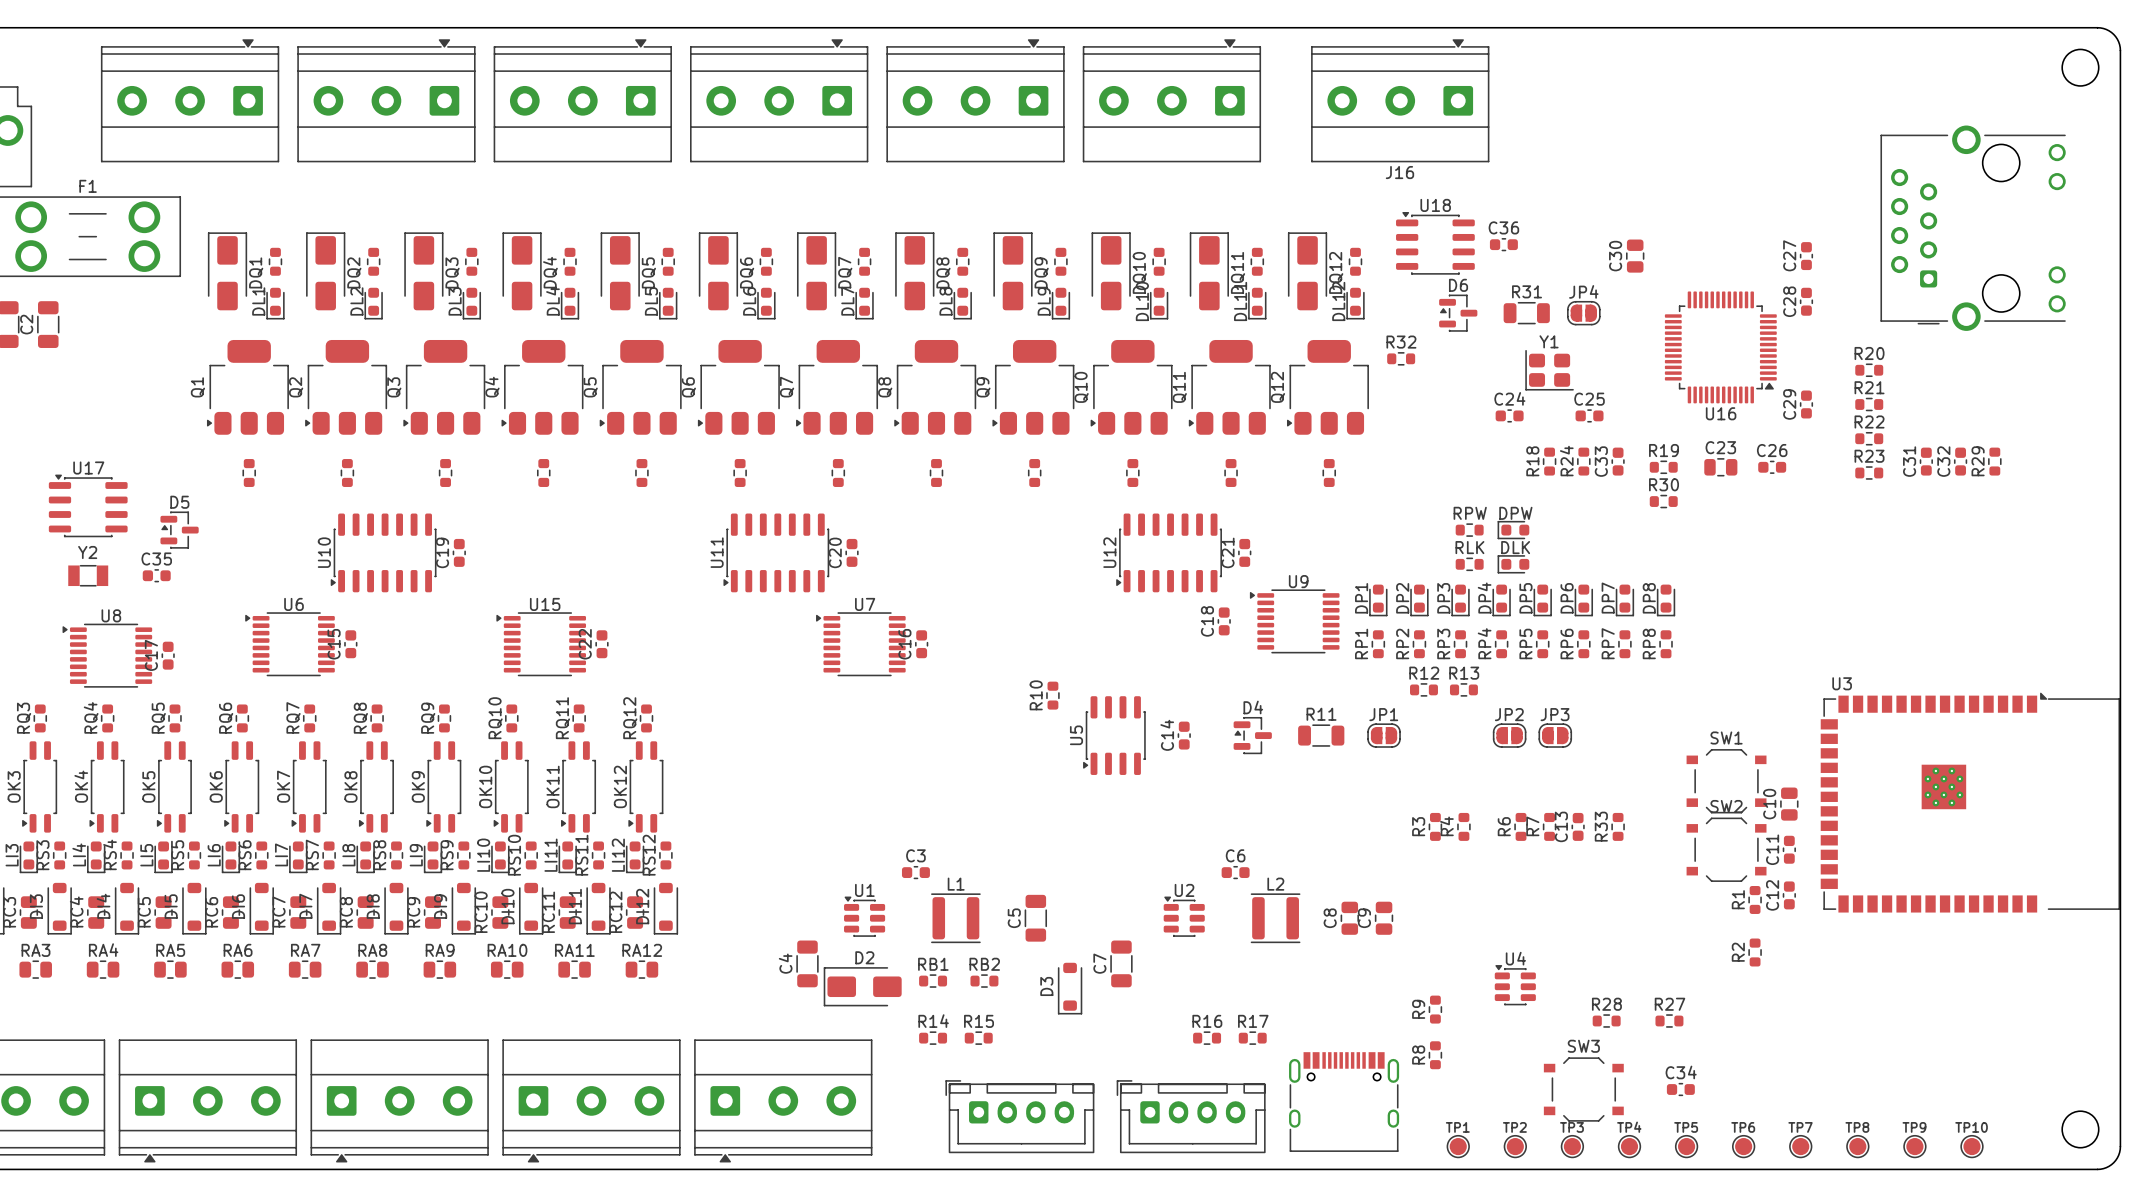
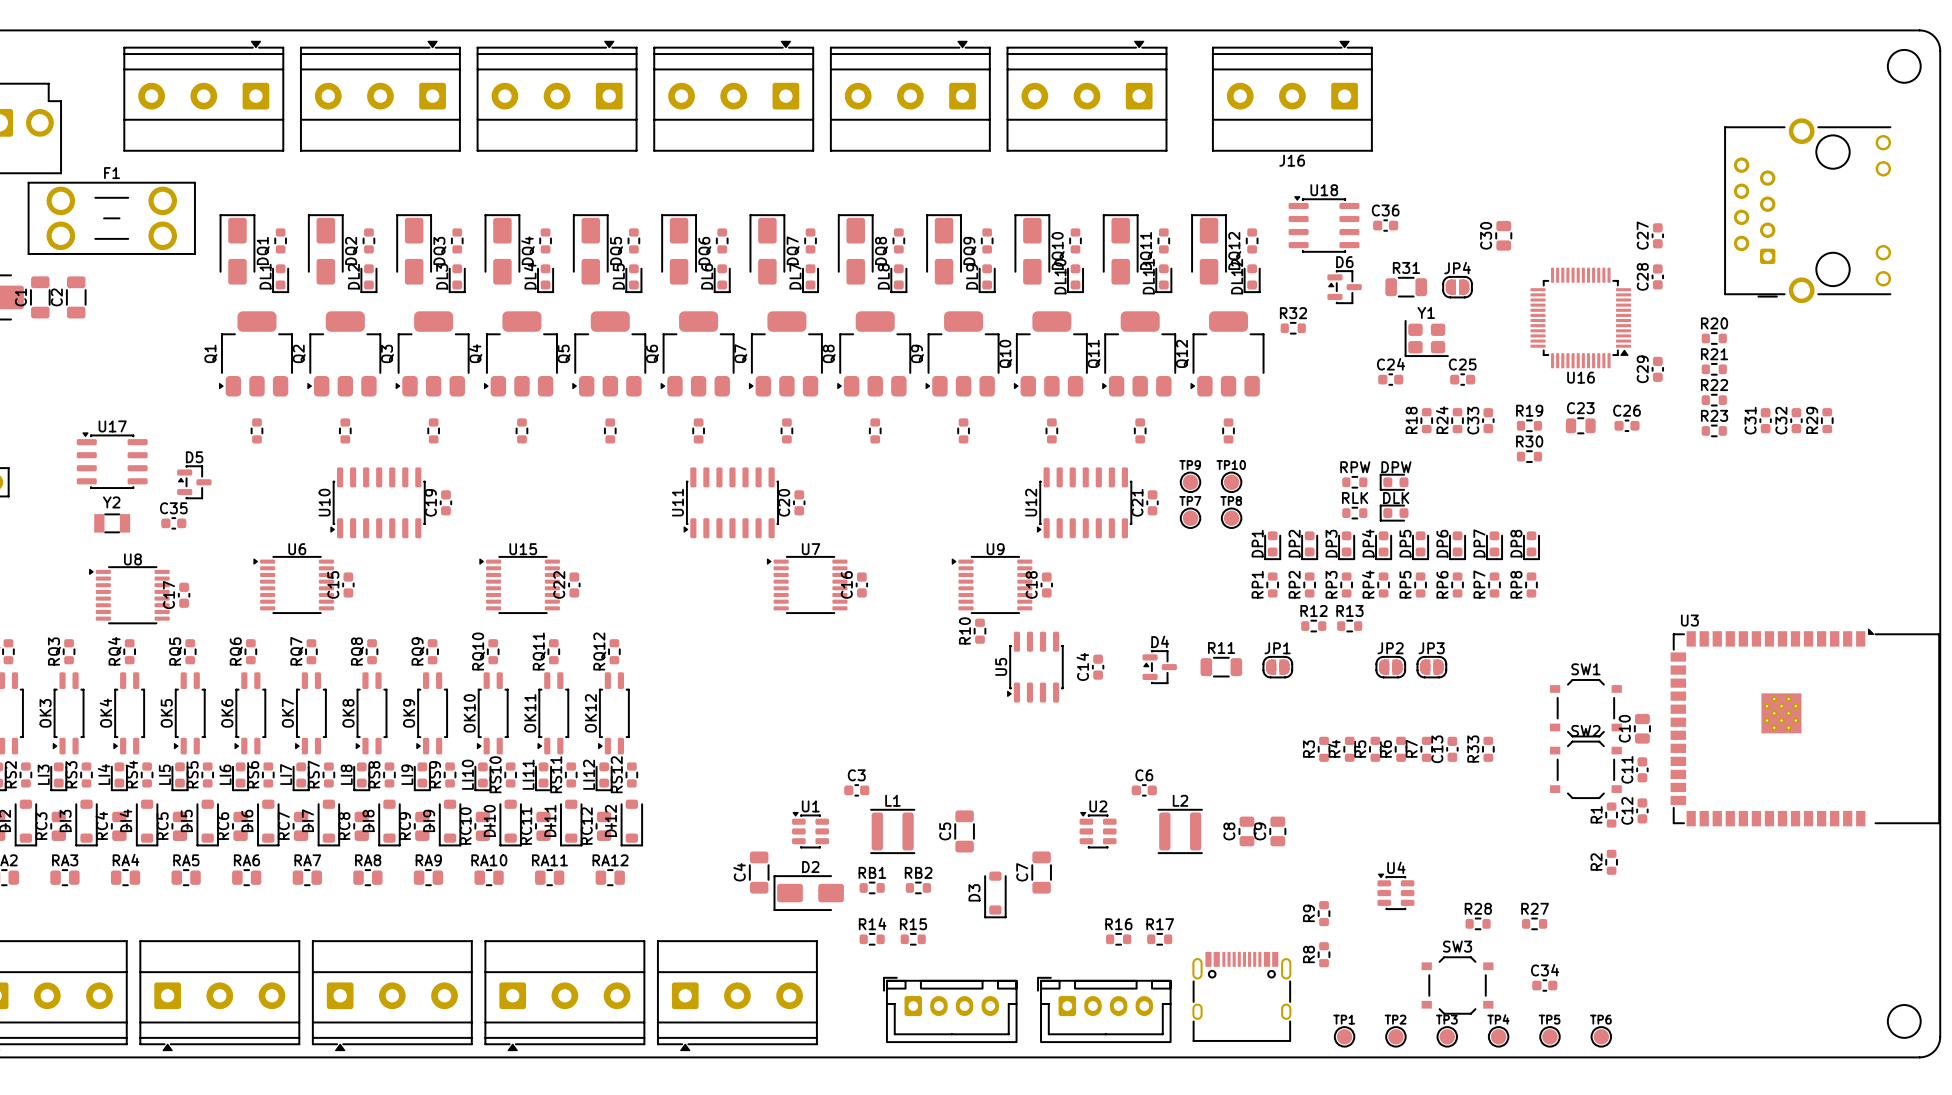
C18 position: (1224, 621) -> (1046, 584)
U9 position: (1294, 621) -> (992, 584)
R5: none -> (1375, 749)
TP7 position: (1800, 1146) -> (1190, 518)
TP8 position: (1857, 1146) -> (1231, 518)
TP9 position: (1914, 1146) -> (1190, 482)
TP10 position: (1971, 1146) -> (1231, 482)

